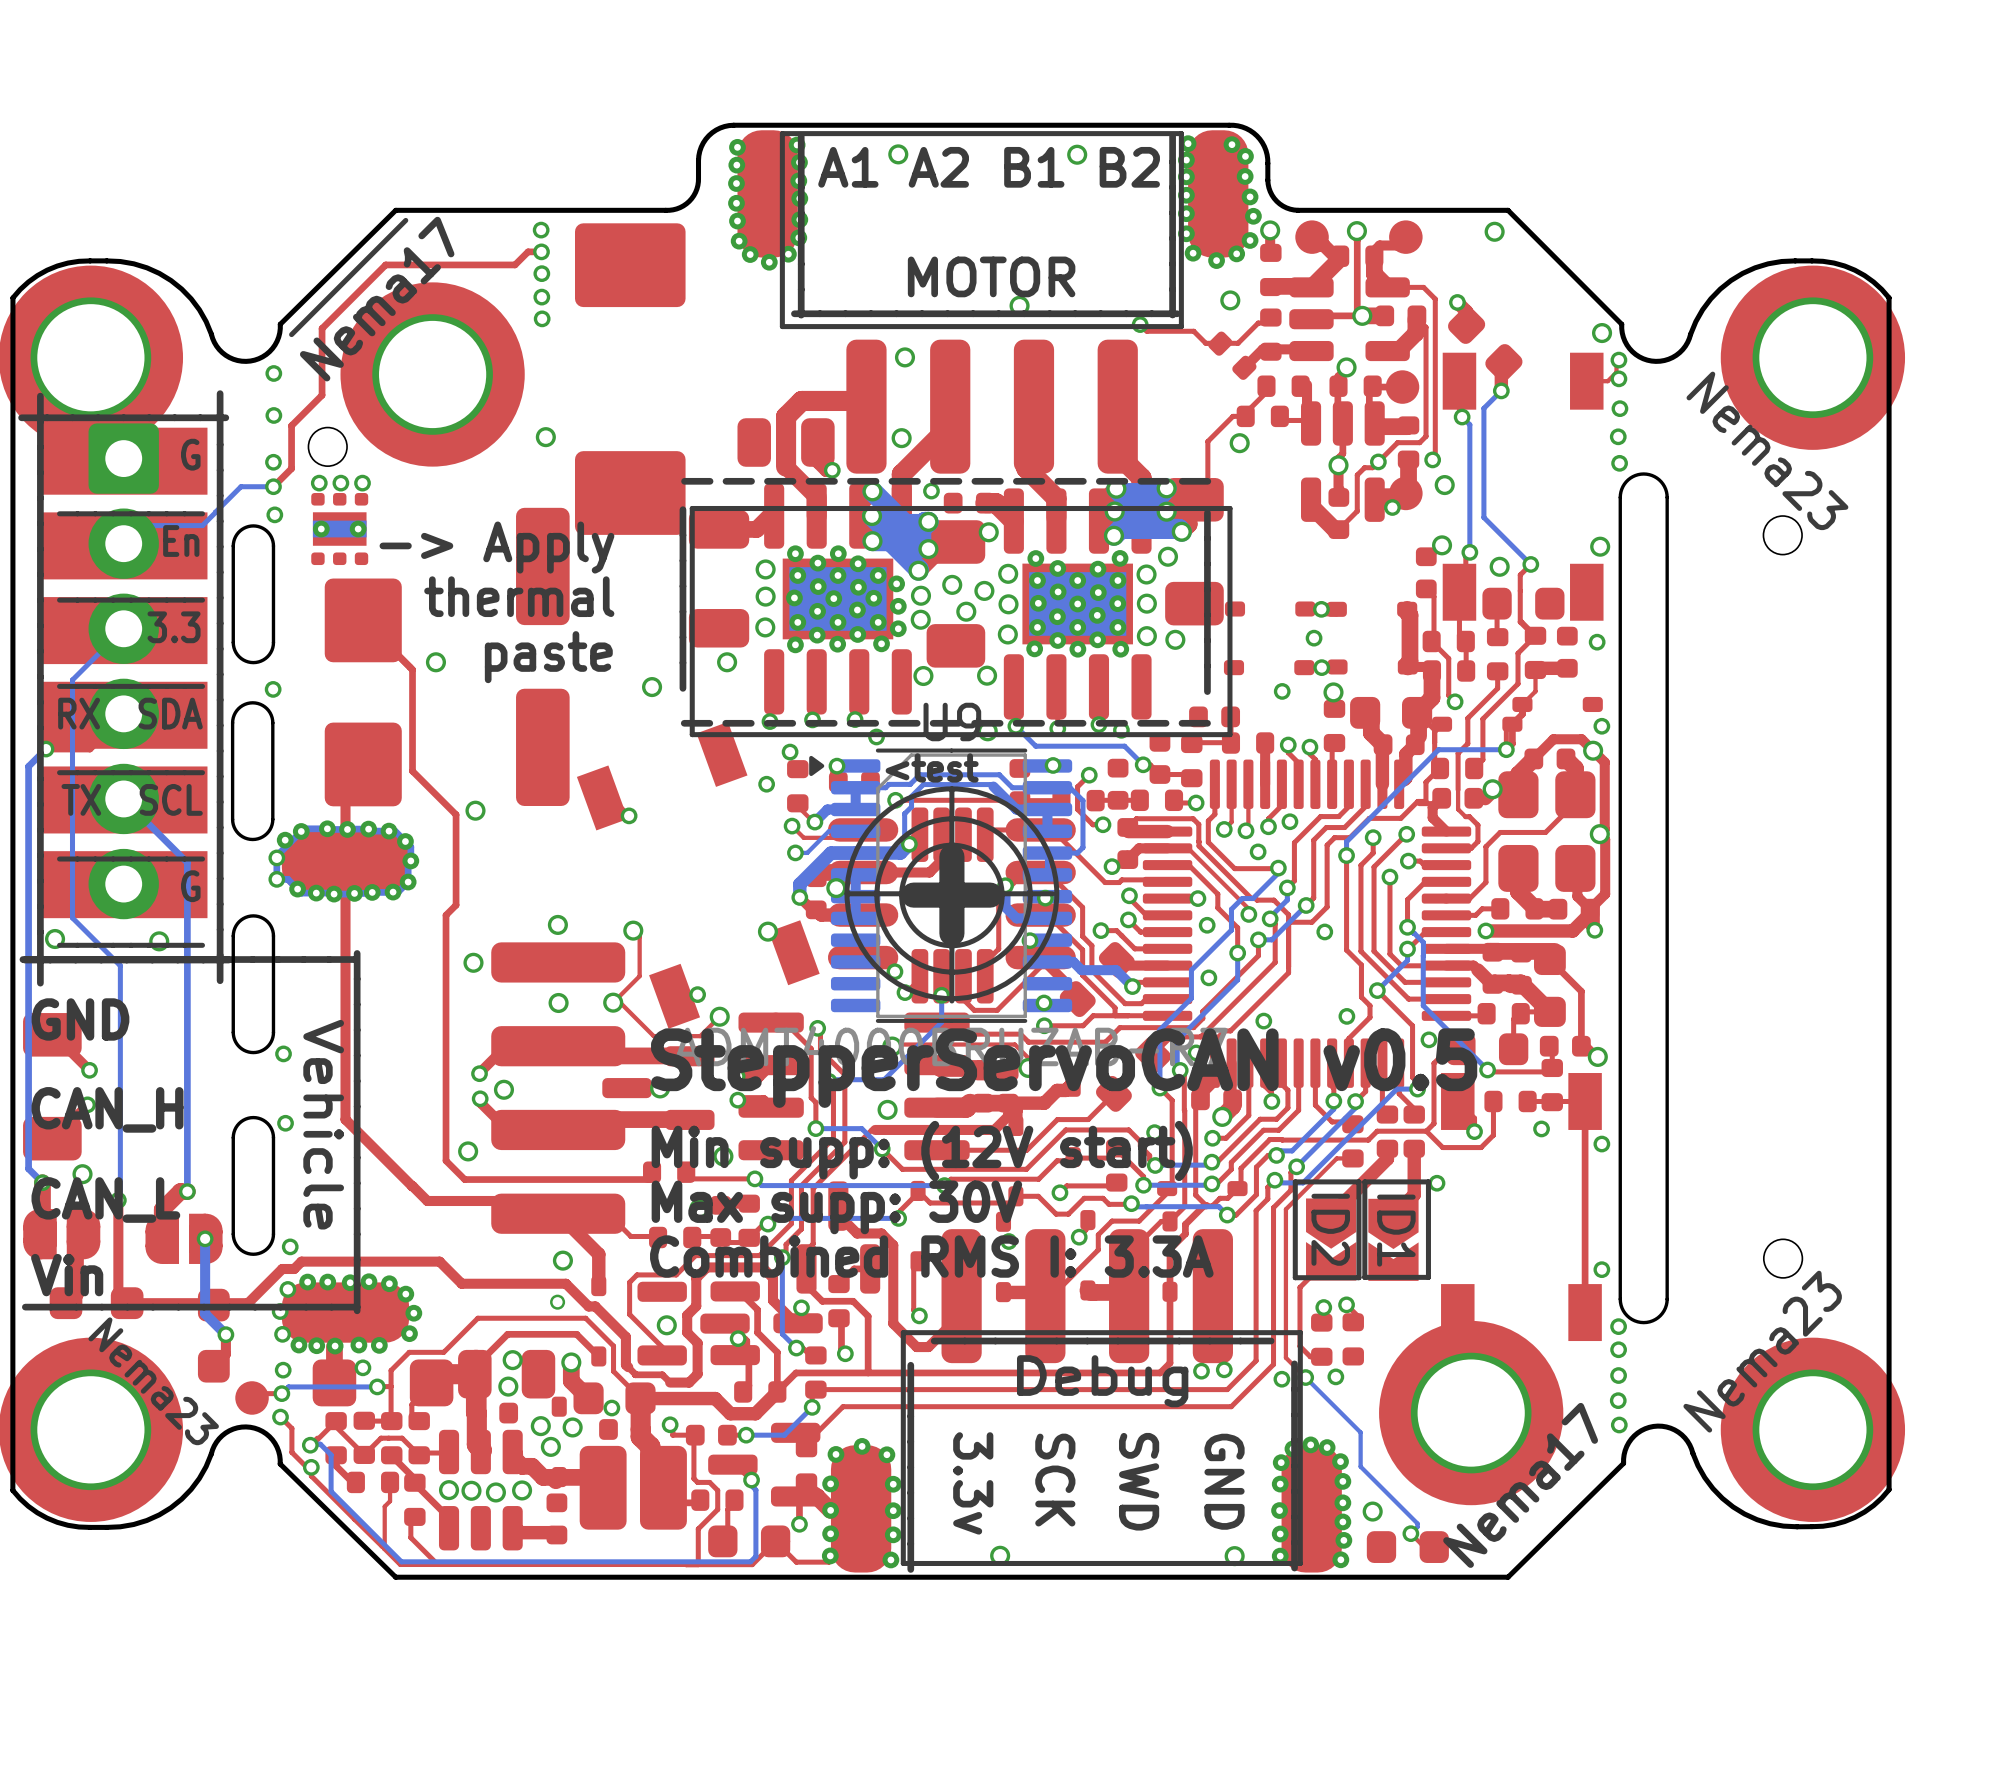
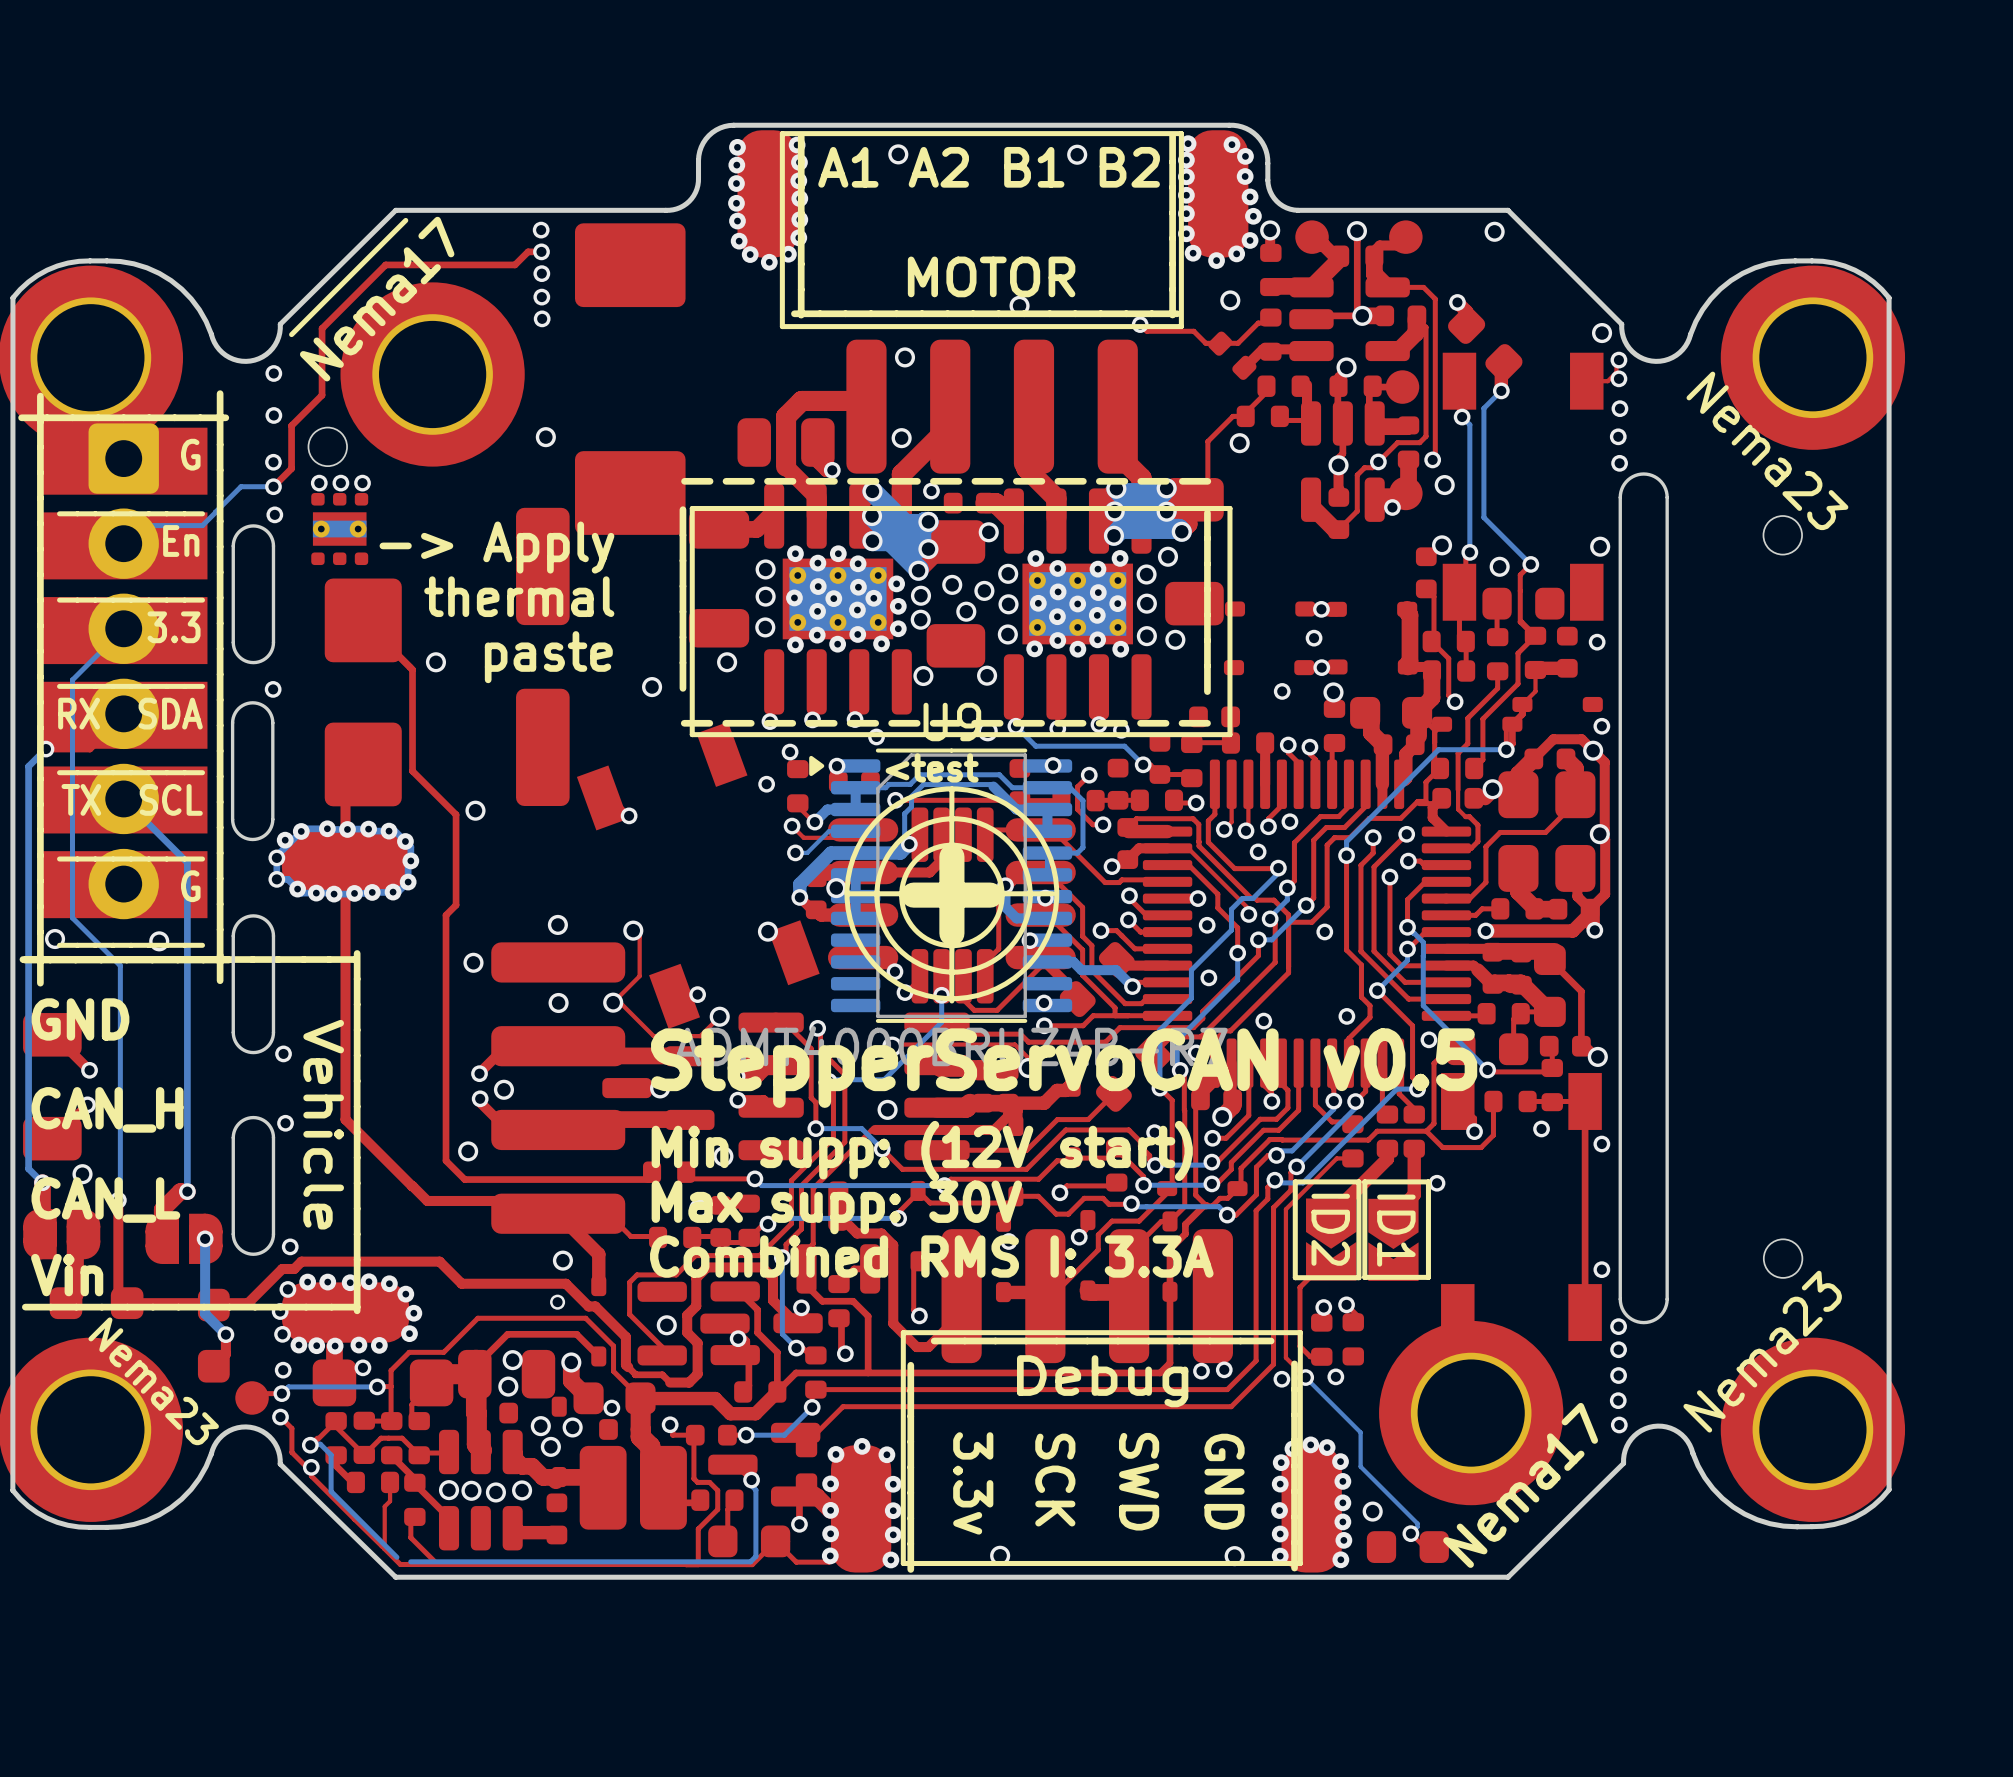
bottom track: (396, 1557) (401, 1561) (410, 1561) -> none

